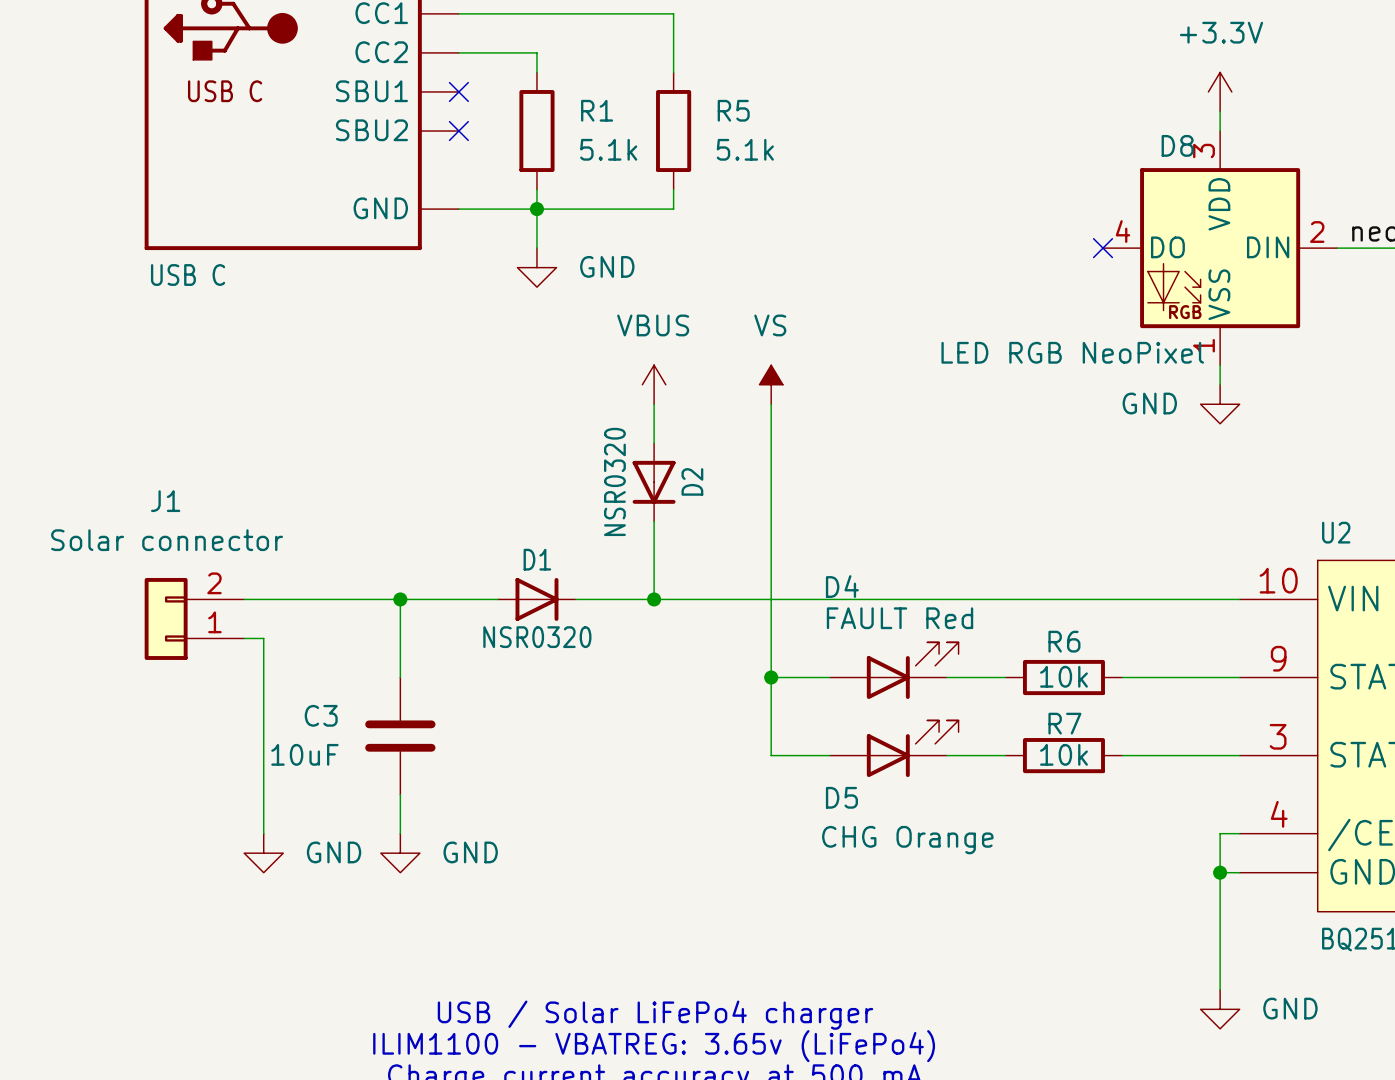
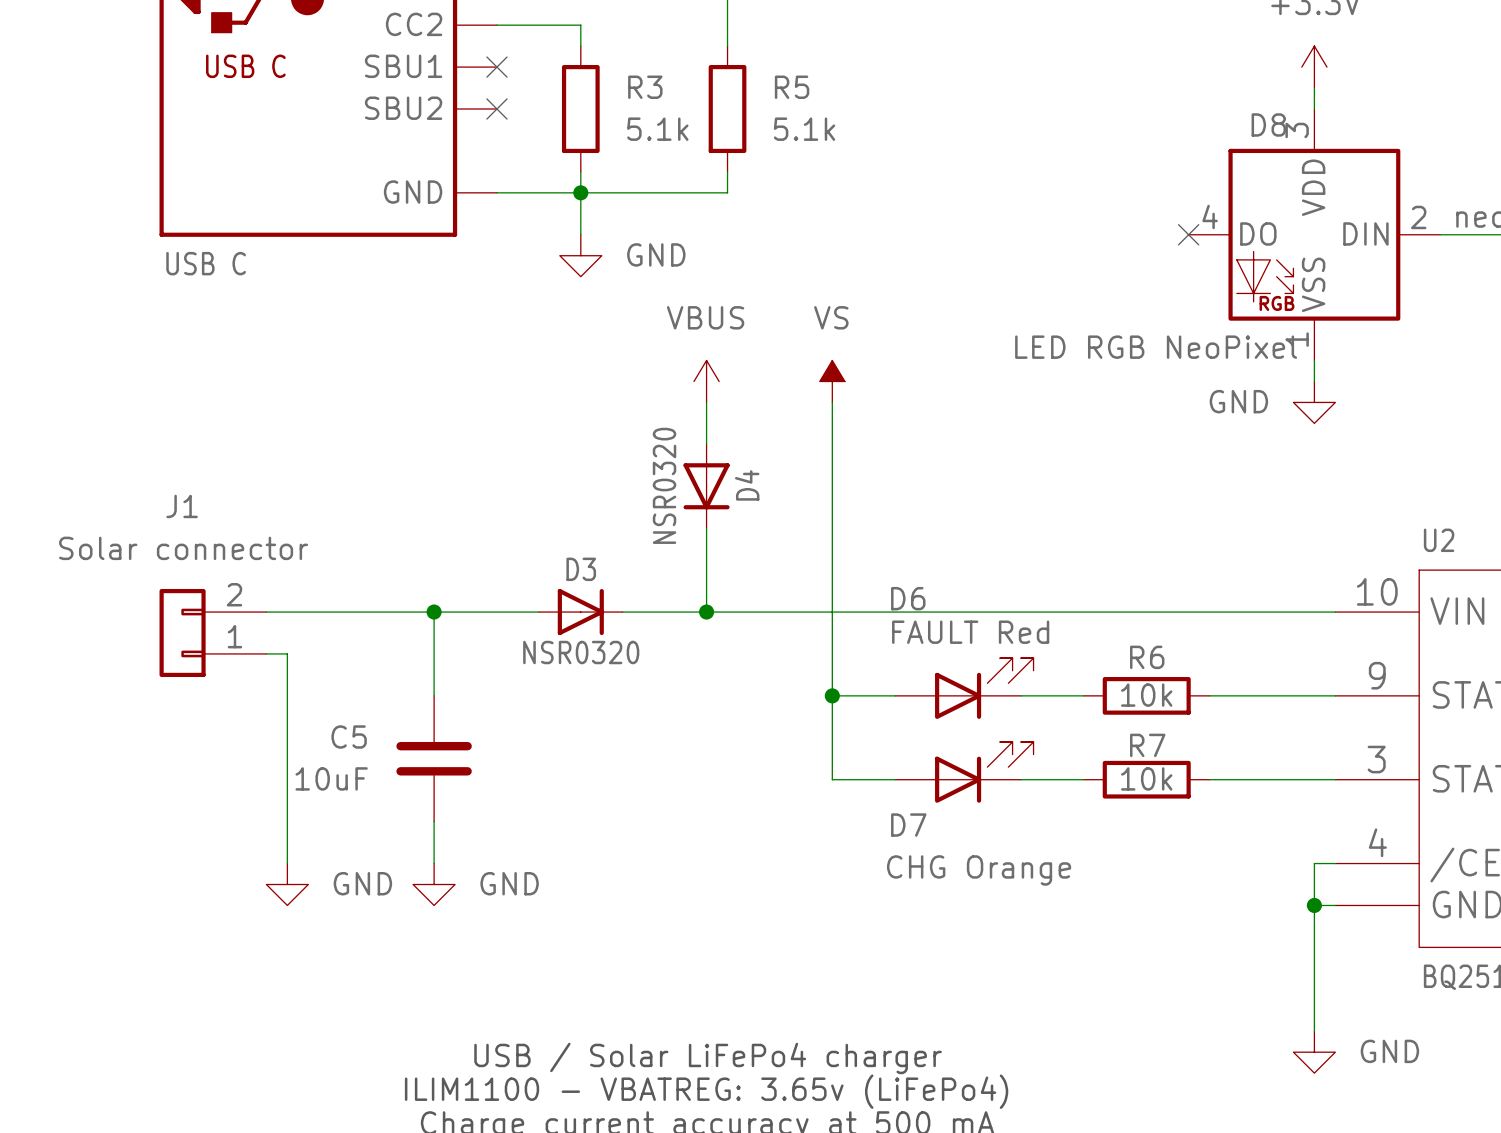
R1 name: R1 (597, 110) -> R3 (645, 87)
D2 name: D2 (692, 481) -> D4 (747, 485)
D1 name: D1 (537, 559) -> D3 (581, 569)
D4 name: D4 (842, 586) -> D6 (908, 598)
C3 name: C3 (321, 715) -> C5 (349, 737)
D5 name: D5 (841, 797) -> D7 (908, 825)

